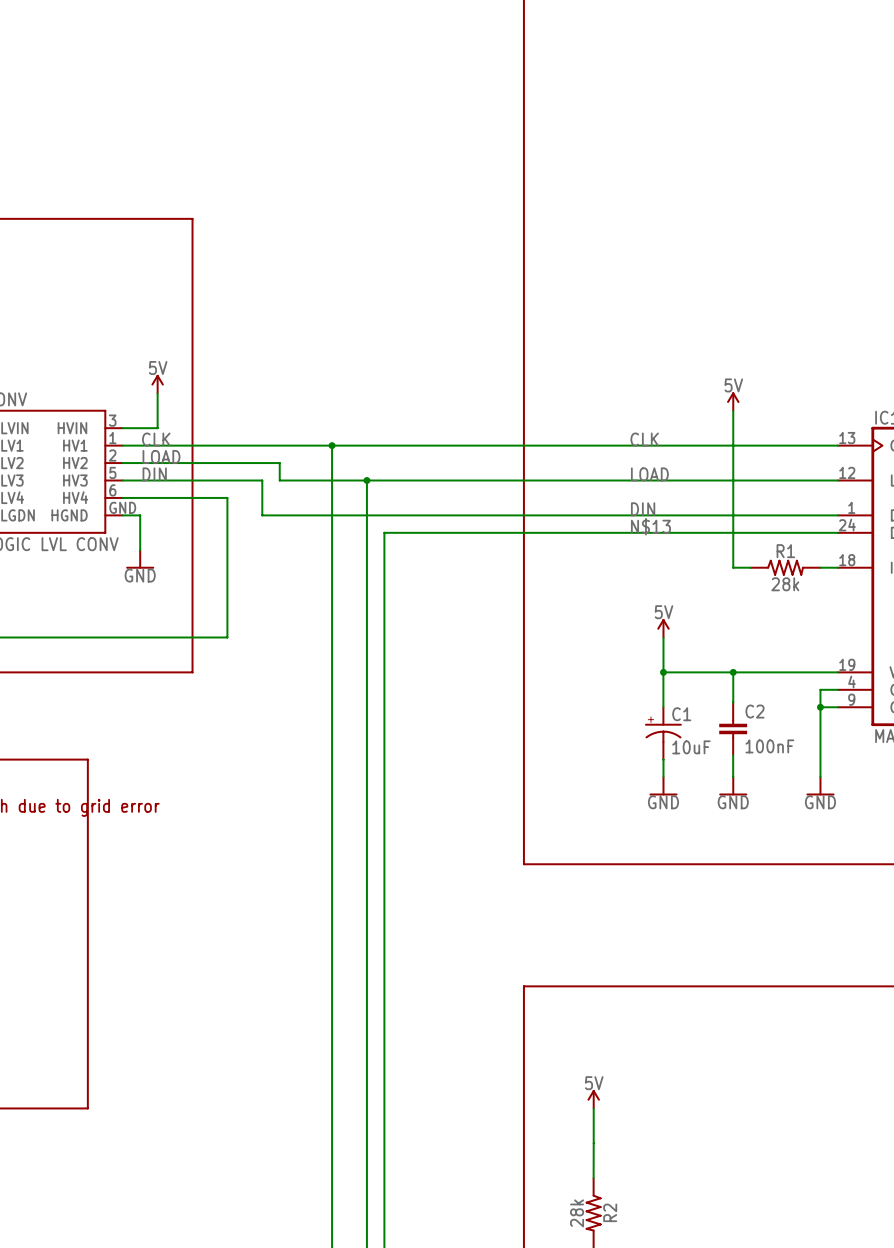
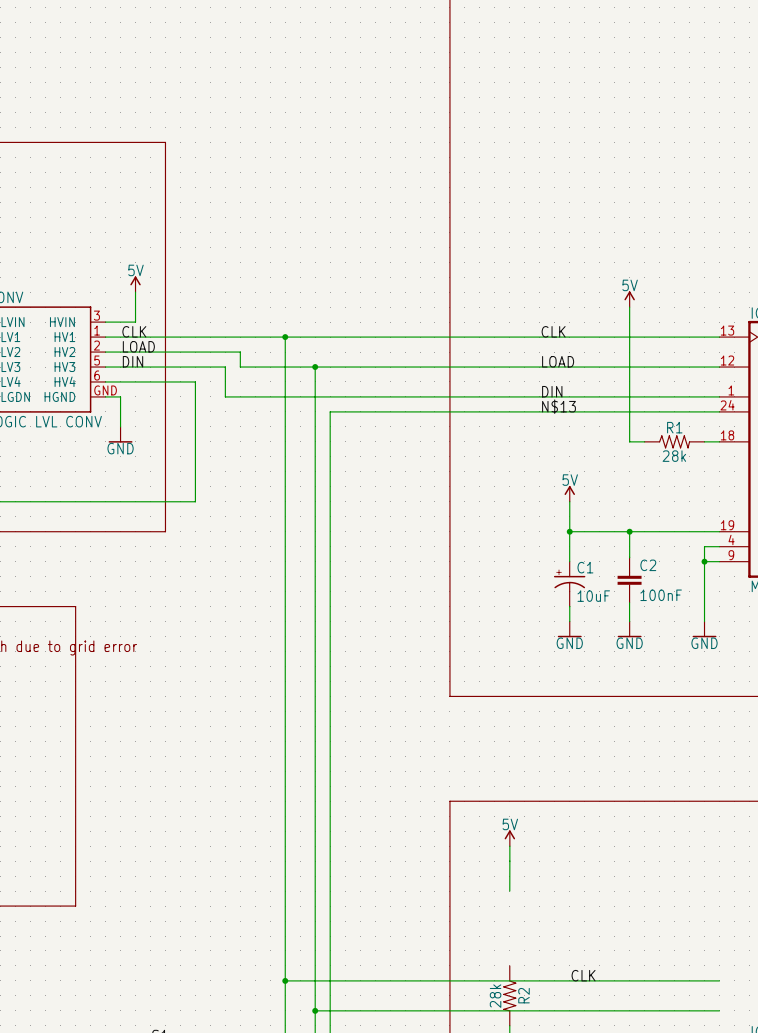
wire: none -> (509, 846) (509, 891)
power symbol position: 5V (593, 1099) -> 5V (509, 838)
wire: (593, 1108) (593, 1178) -> none
label: none -> CLK (583, 975)
wire: none -> (285, 980) (719, 980)
junction: none -> (285, 980)
wire: none -> (315, 1010) (719, 1010)
junction: none -> (315, 1010)

